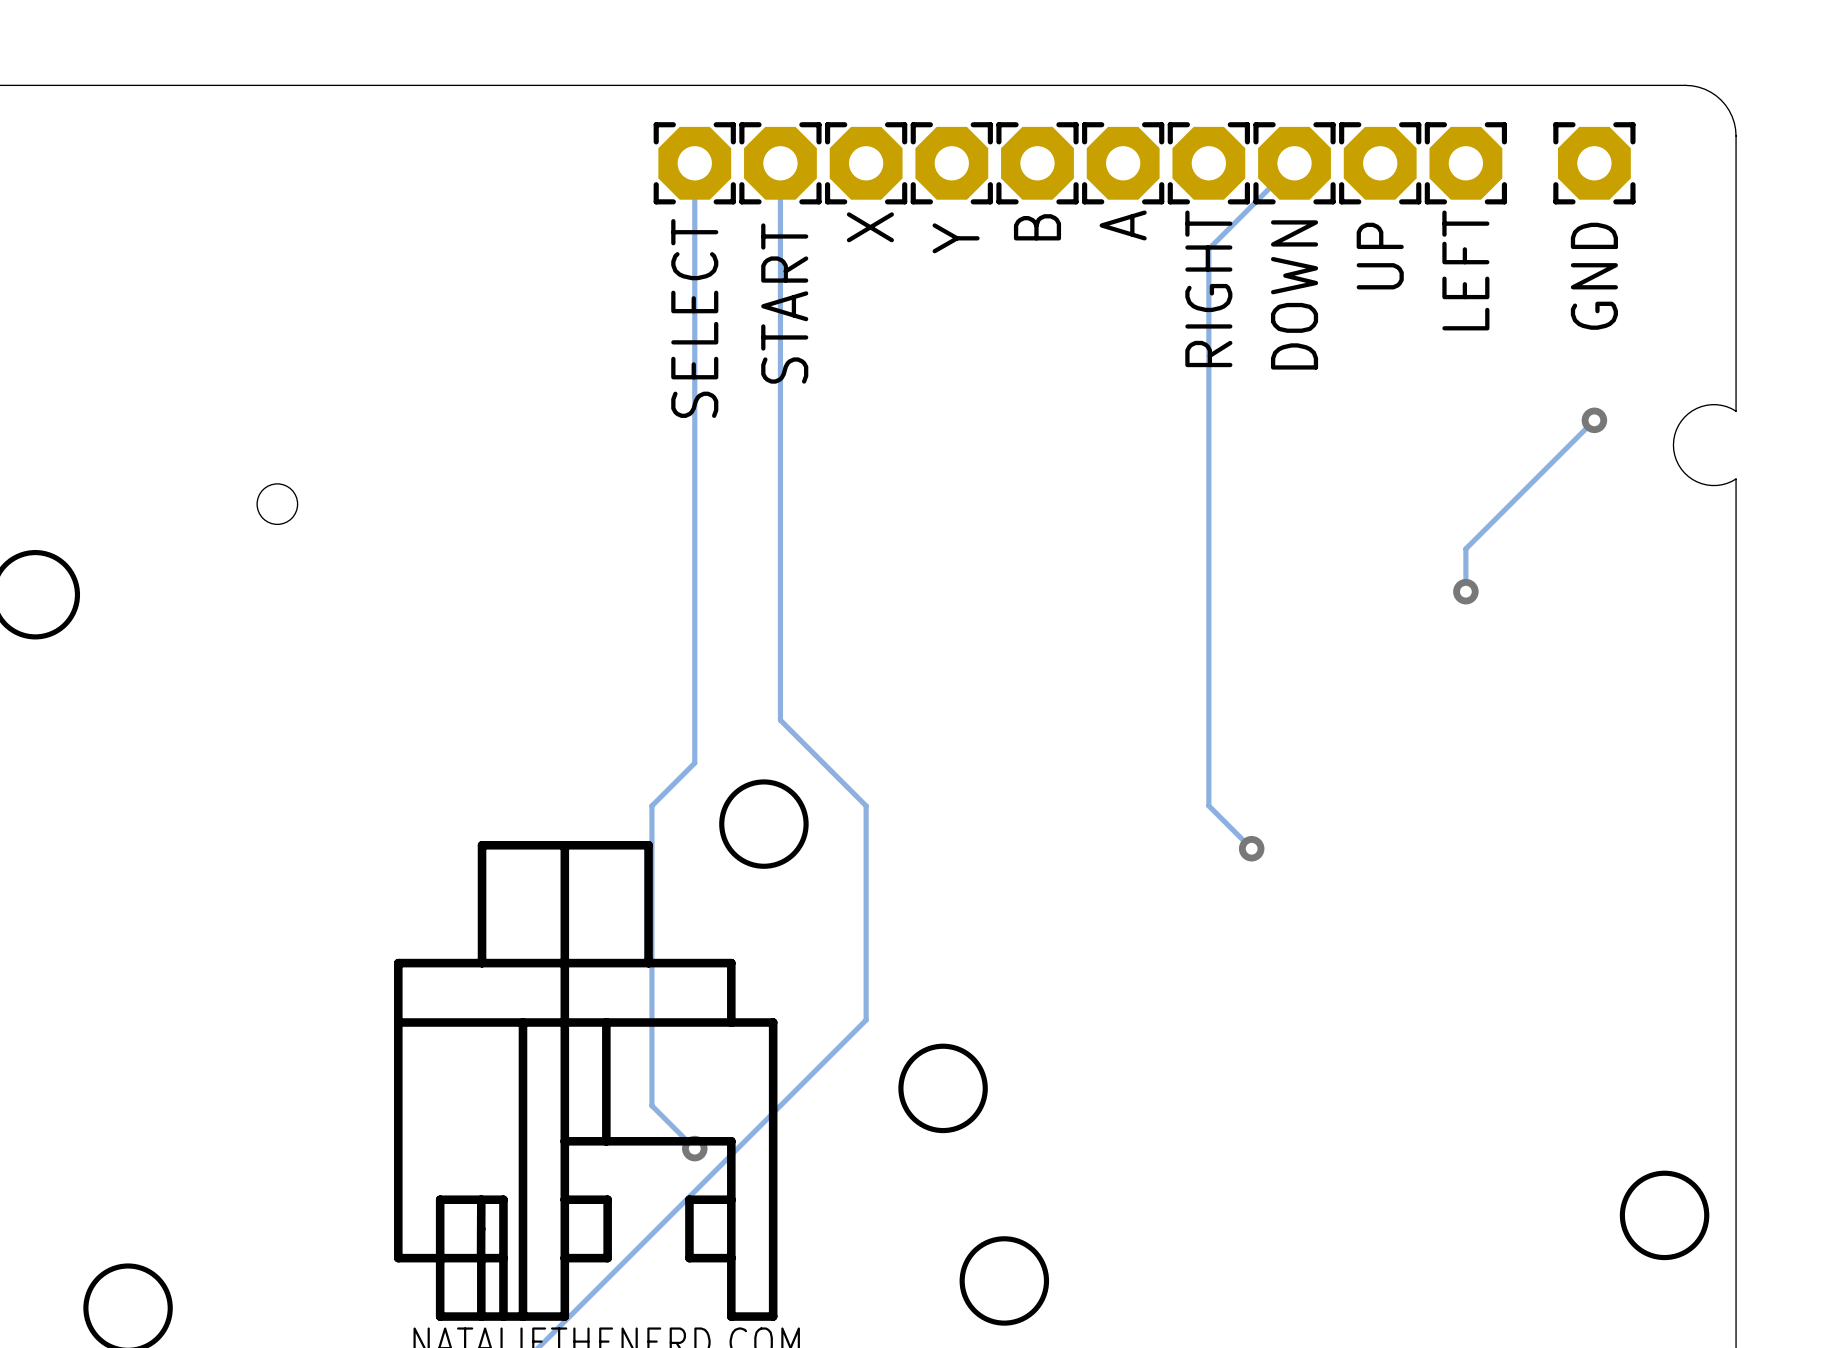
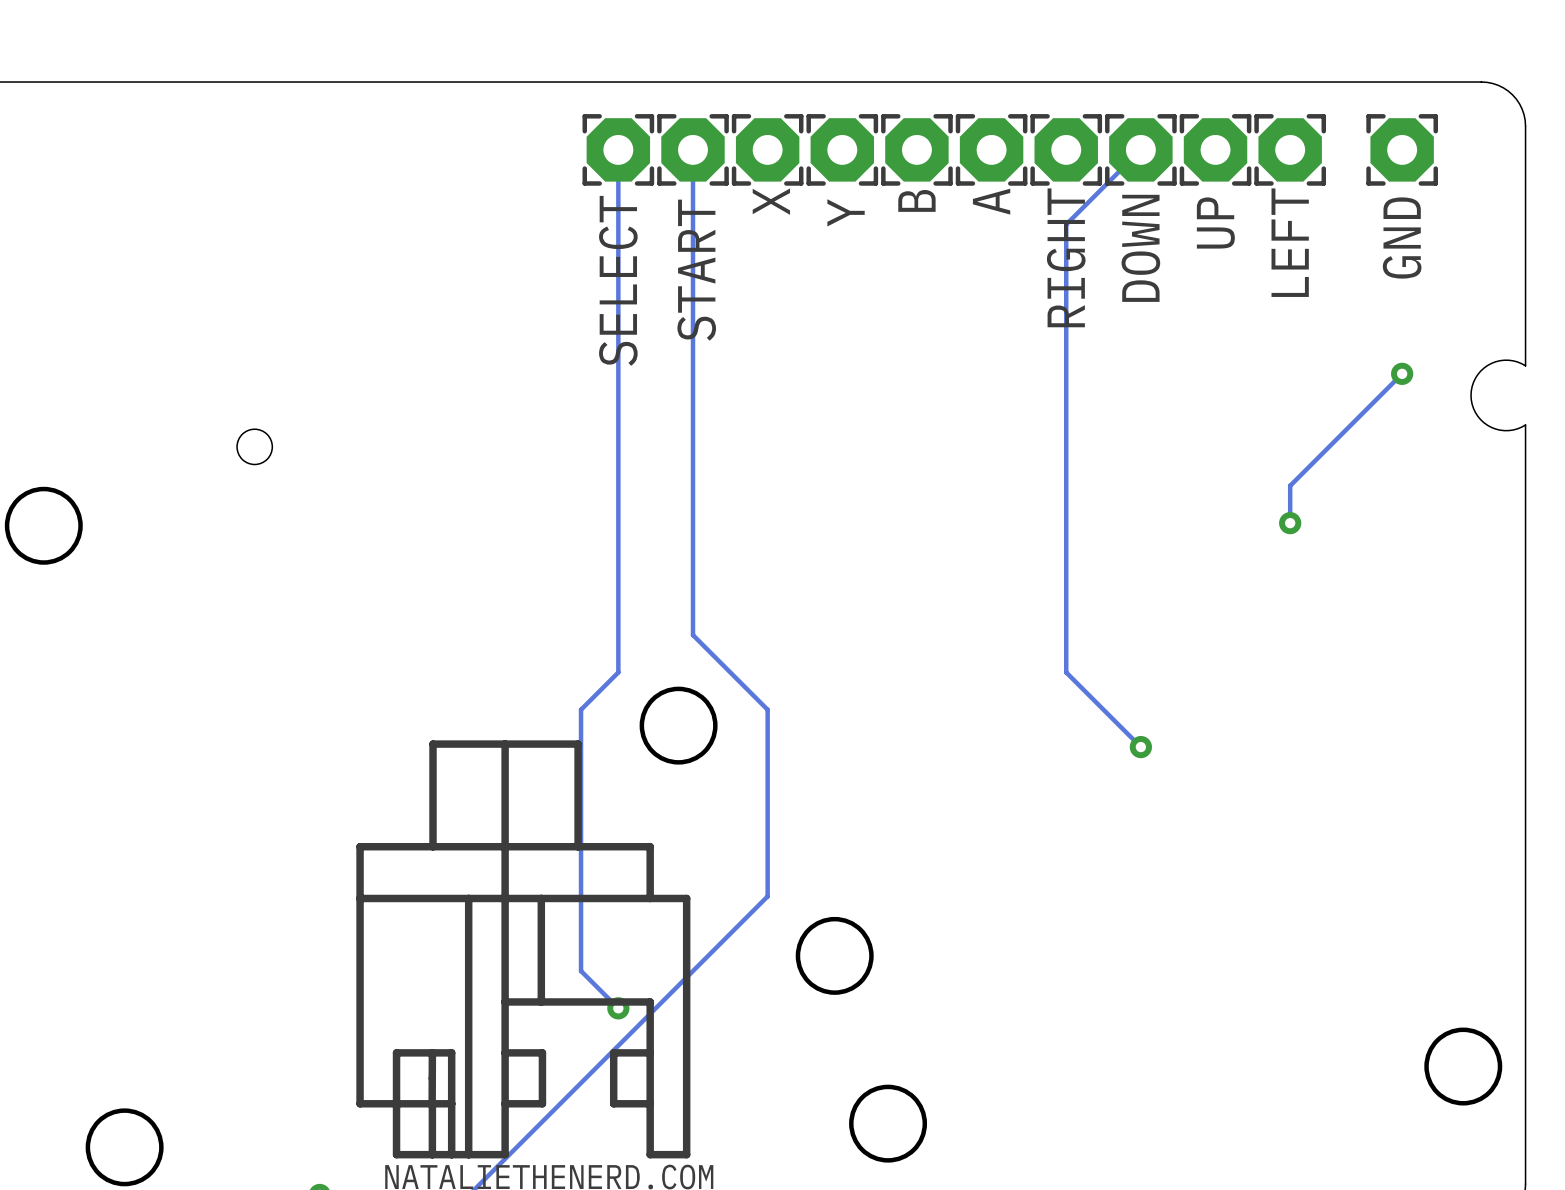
track: (1208, 763) (1208, 805) (1251, 848) -> (1066, 672) (1140, 747)
via position: (1251, 848) -> (1140, 747)

